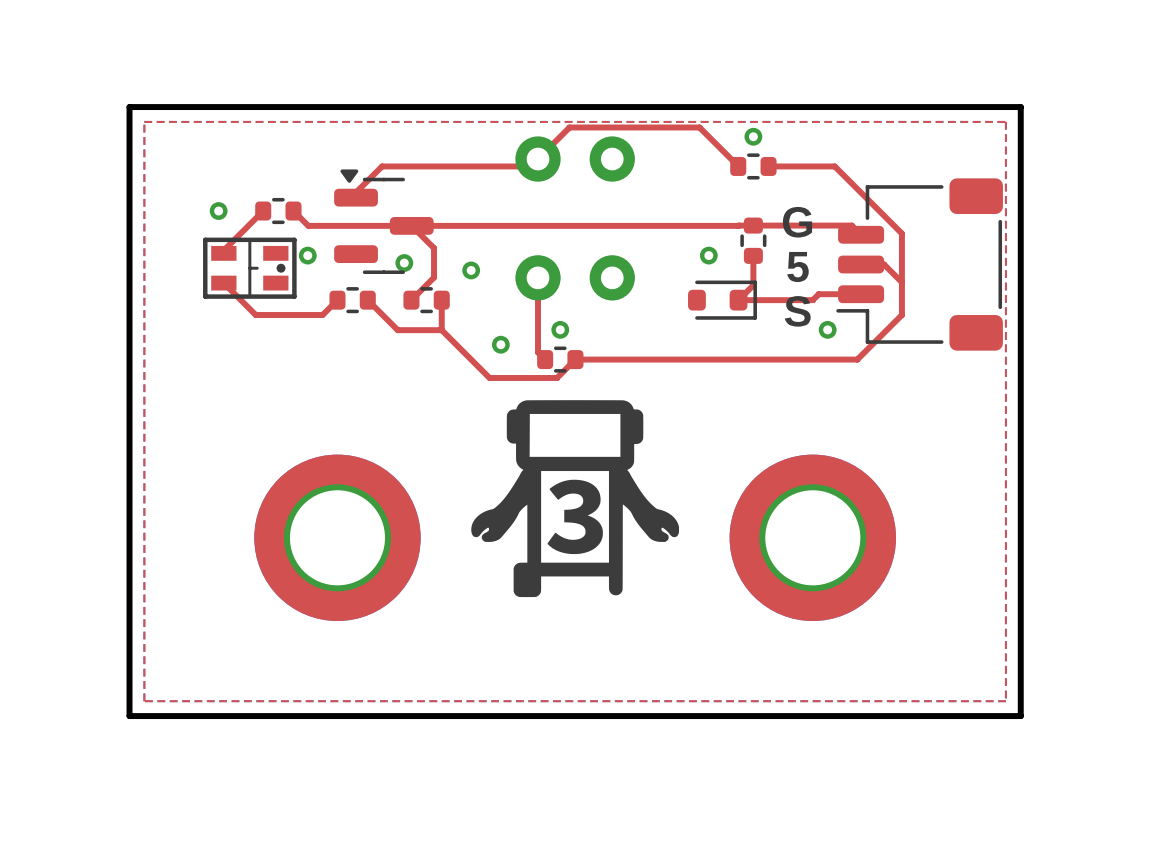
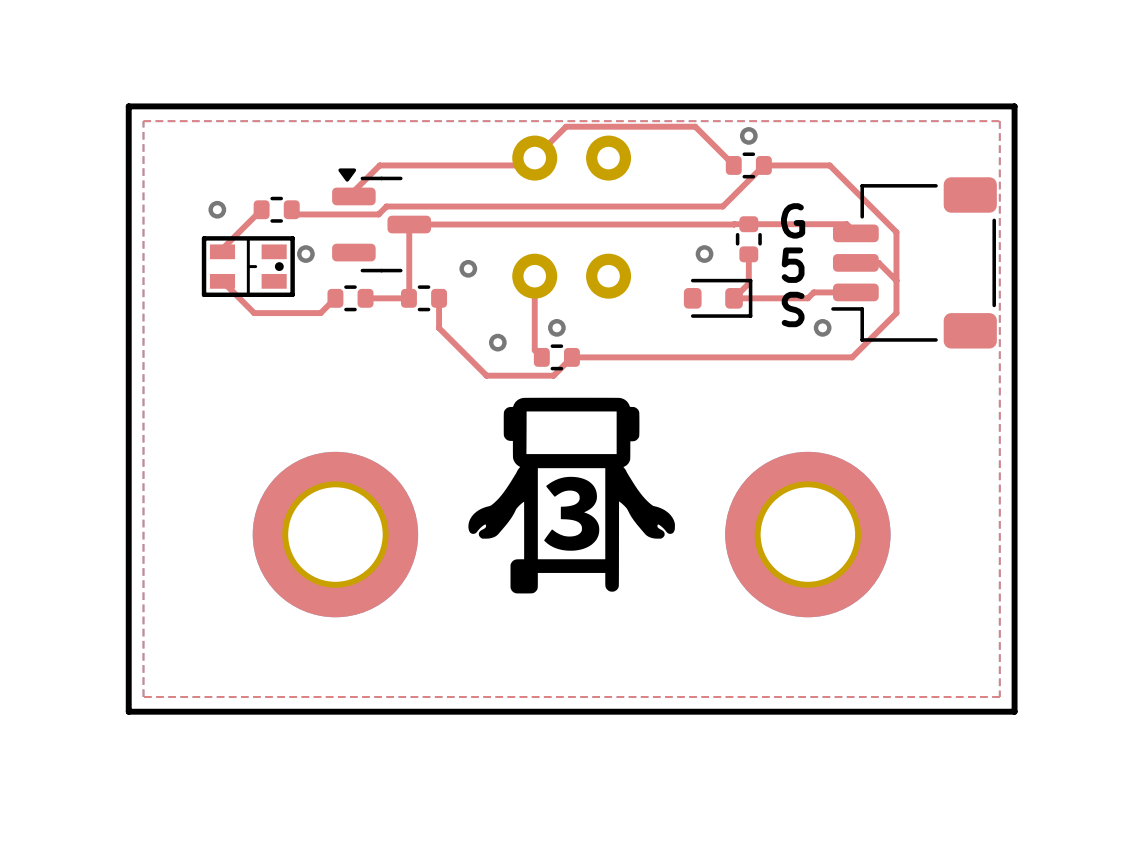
top track: none -> (763, 165) (722, 206) (386, 206) (378, 214) (296, 214) (291, 209)
top track: (293, 211) (308, 225) (411, 225) (434, 248) (434, 277) (411, 299) -> (409, 224) (409, 298)
via: (404, 263) -> none
top track: (367, 300) (397, 330) (441, 330) -> (365, 298) (408, 298)

